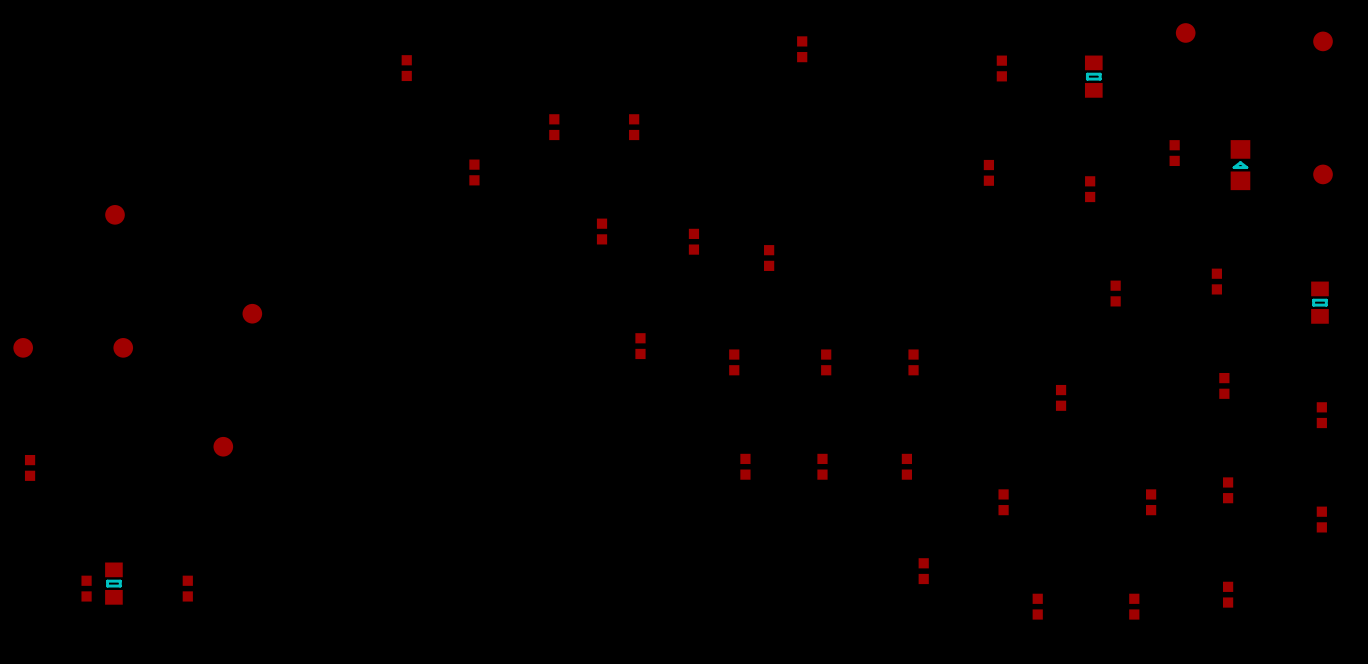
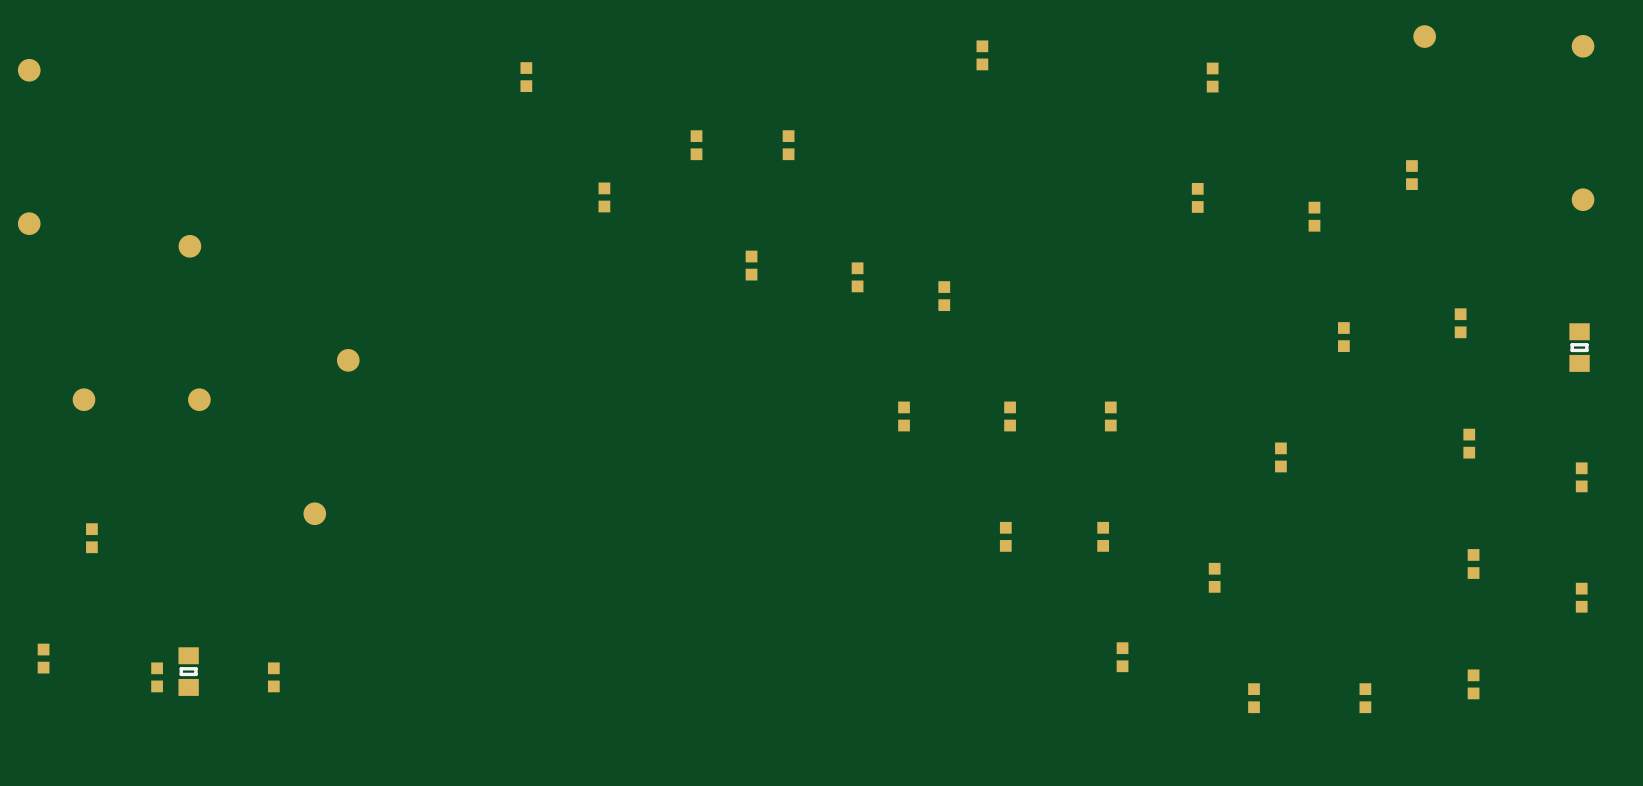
part: (1093, 76) -> none
part: (1240, 165) -> none
part: (640, 346) -> none
part: (745, 466) -> none
part: (1151, 502) -> none

